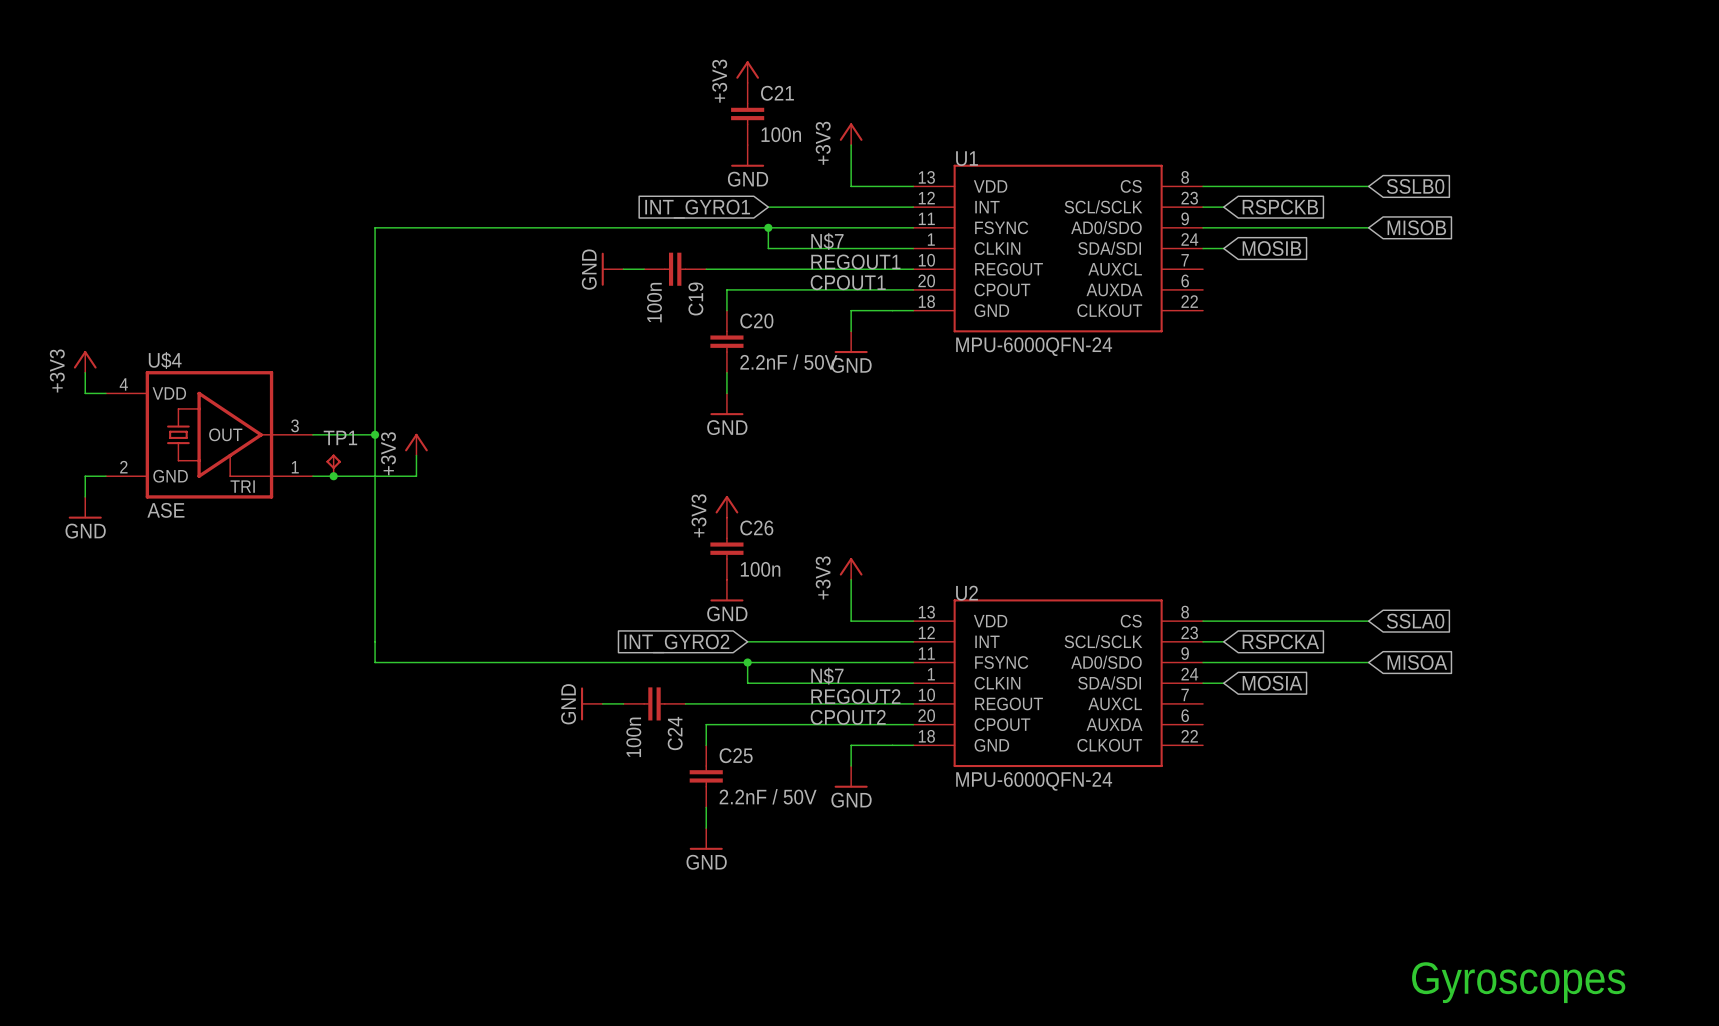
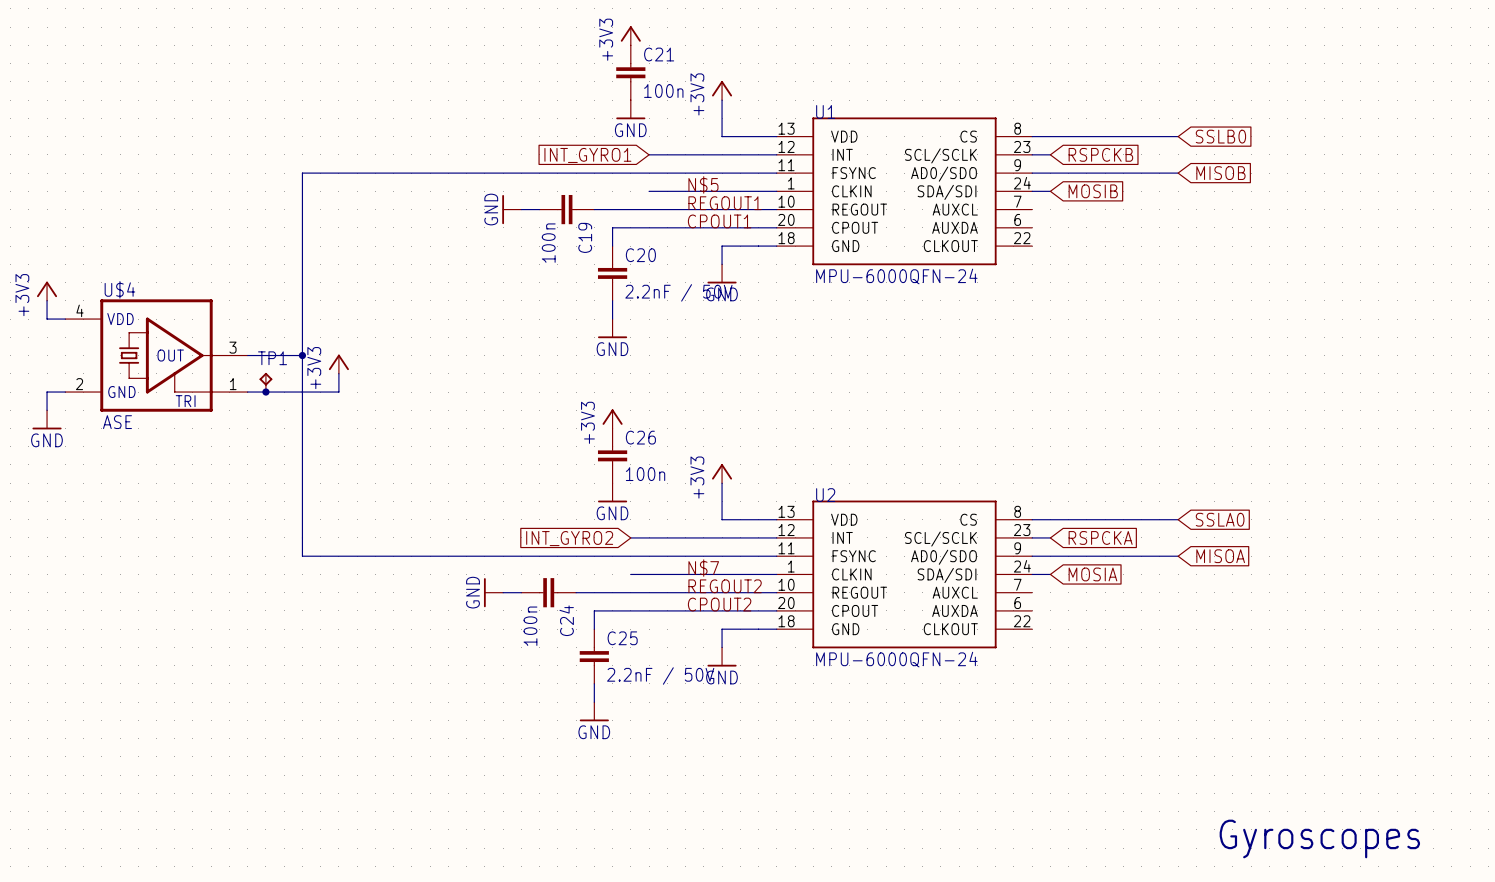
wire: (768, 227) (768, 248) -> none
junction: (768, 227) -> none
label: N$7 (827, 241) -> N$5 (703, 184)
wire: (747, 662) (747, 683) -> none
junction: (747, 662) -> none

